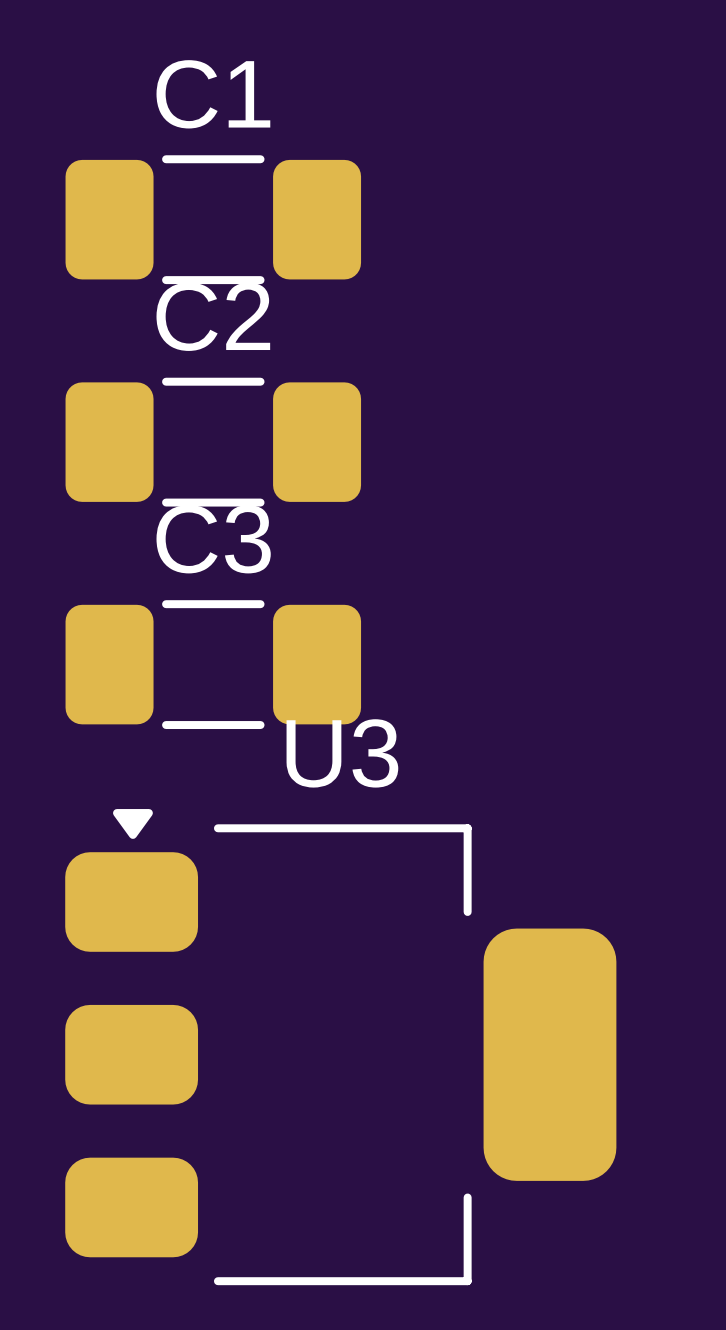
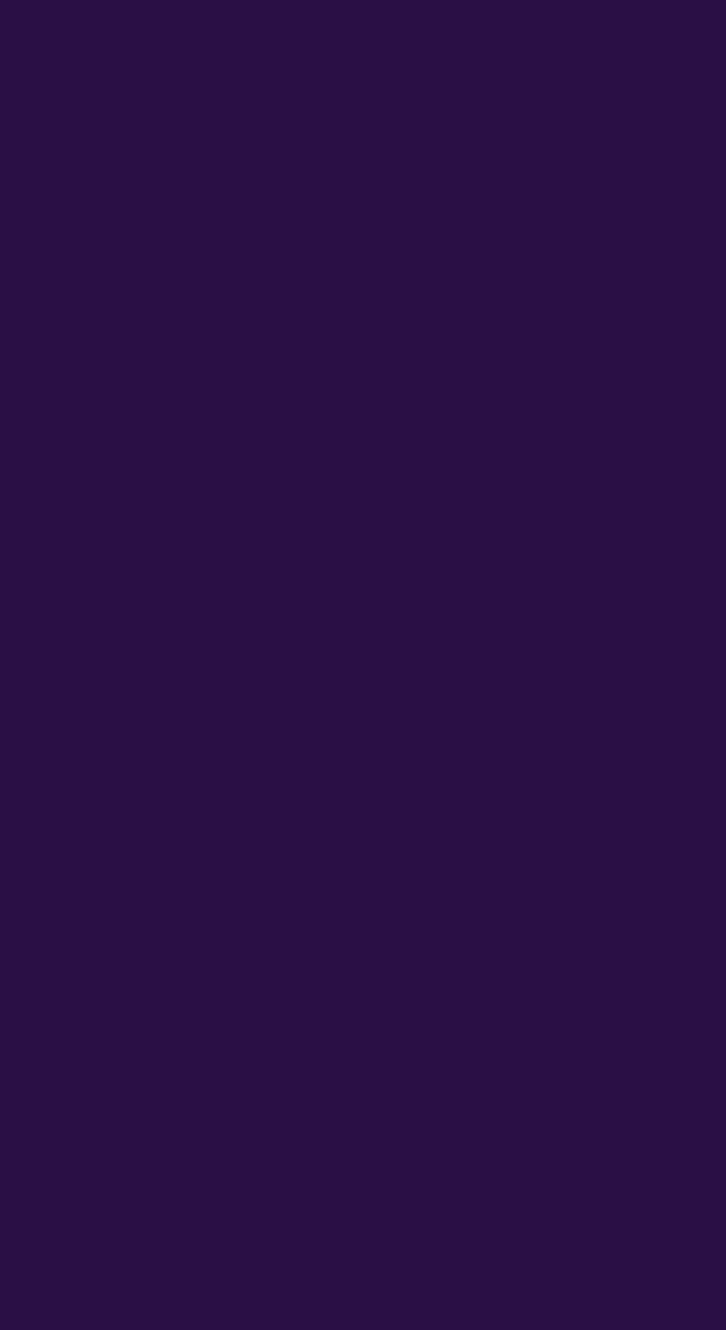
C1: (213, 219) -> none
C2: (213, 442) -> none
C3: (213, 664) -> none
U3: (340, 1047) -> none

